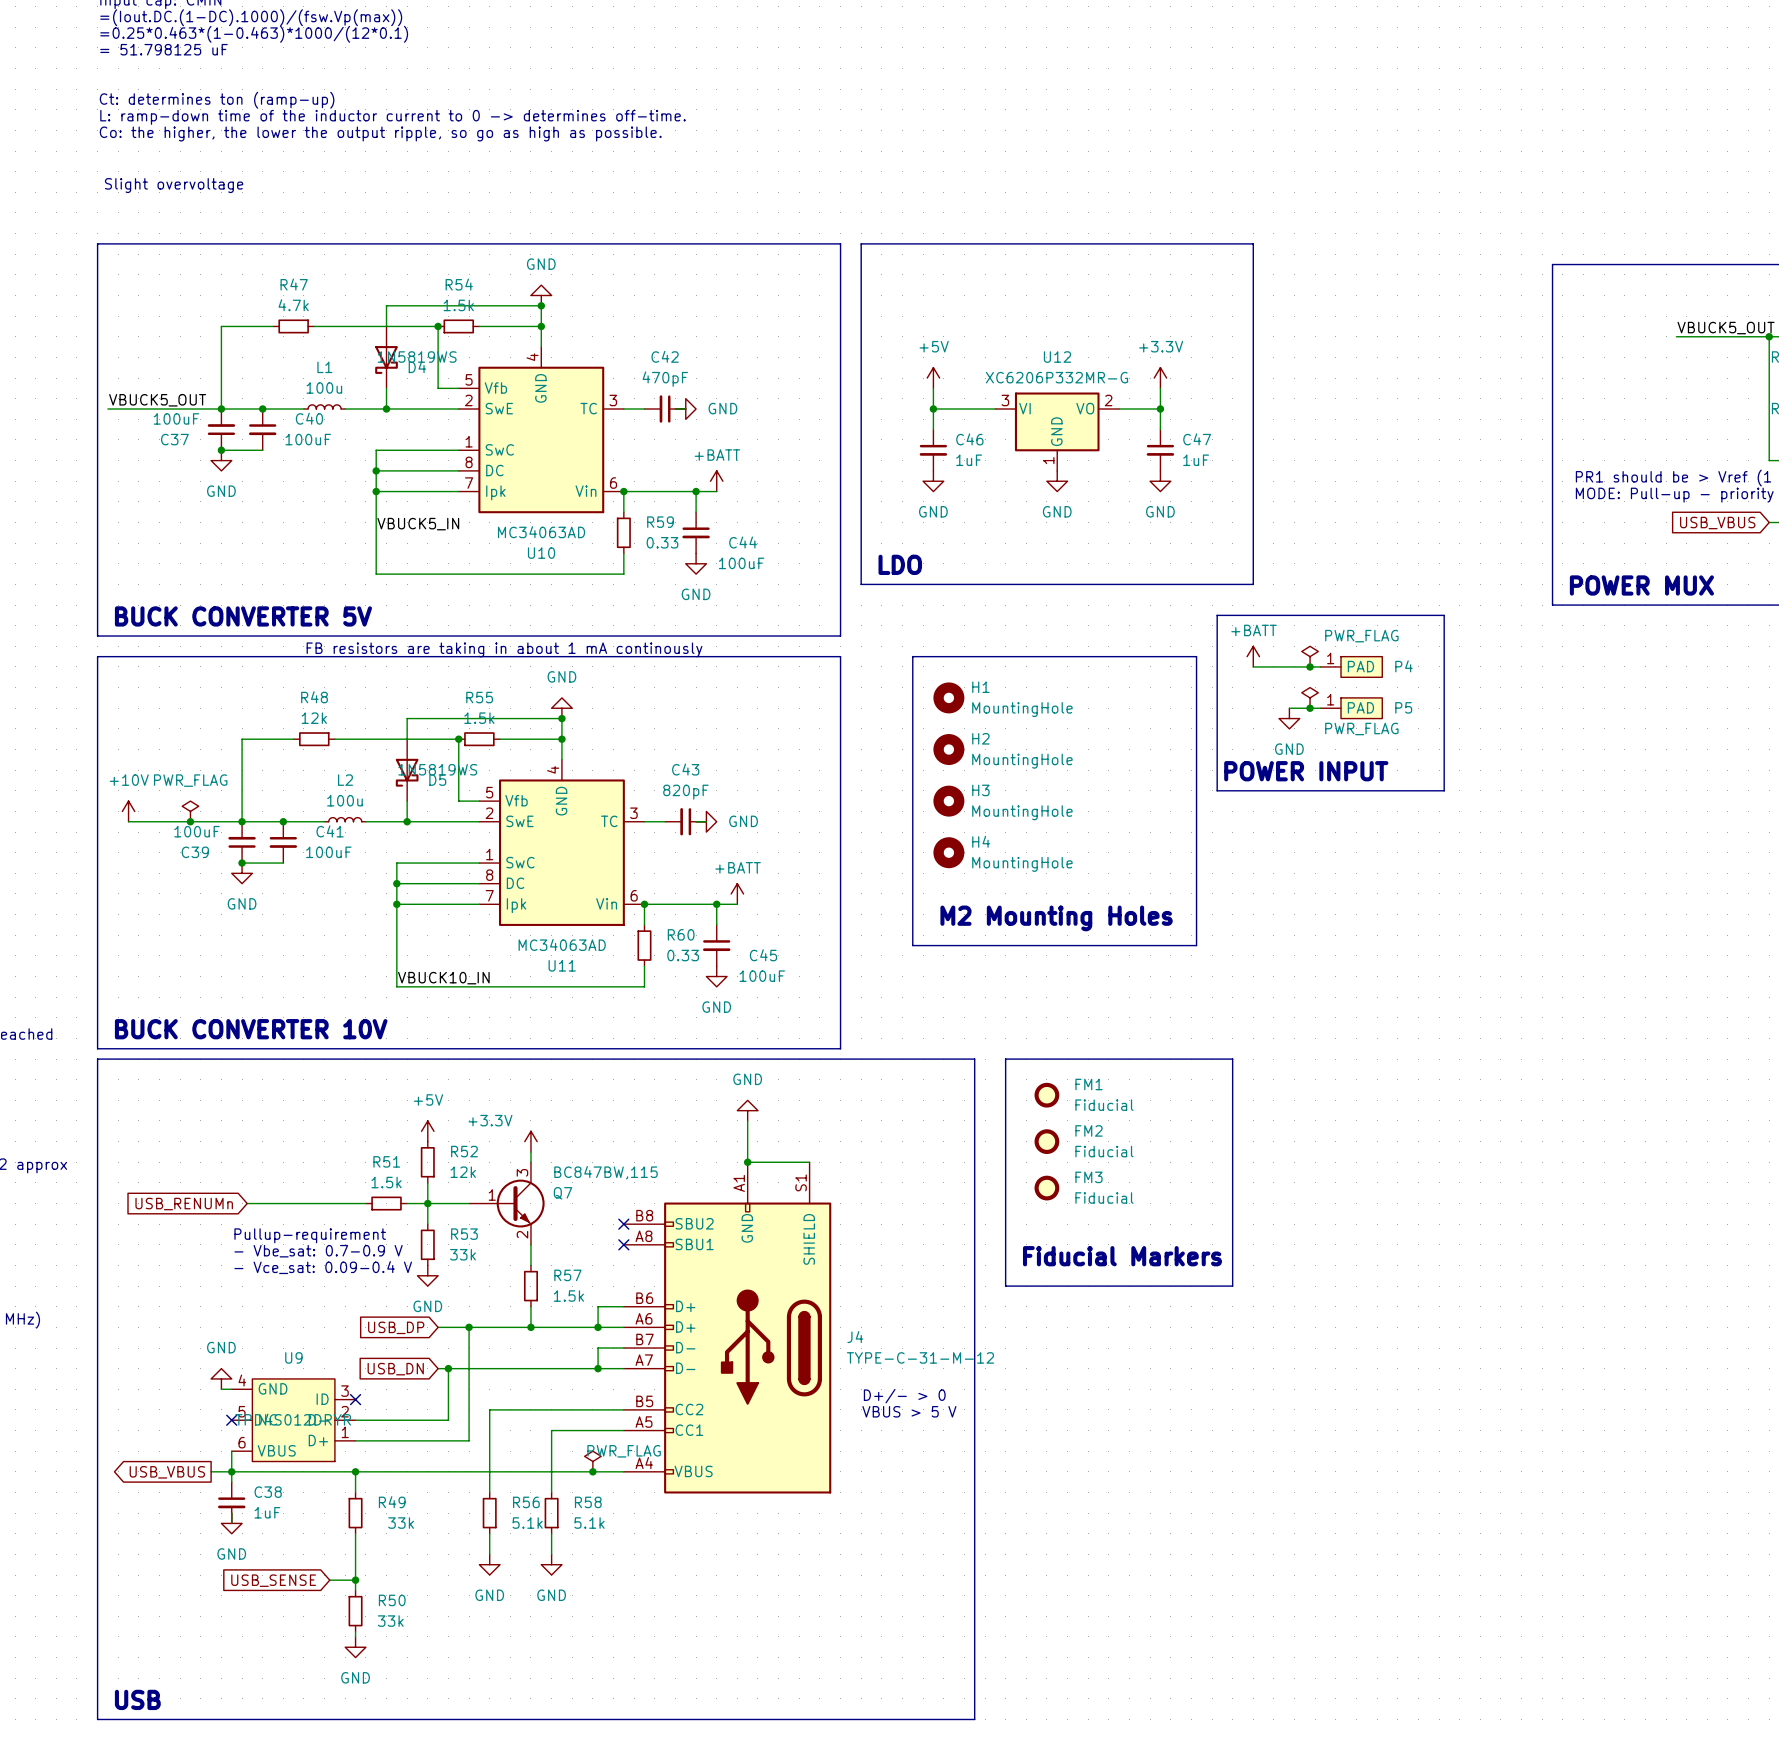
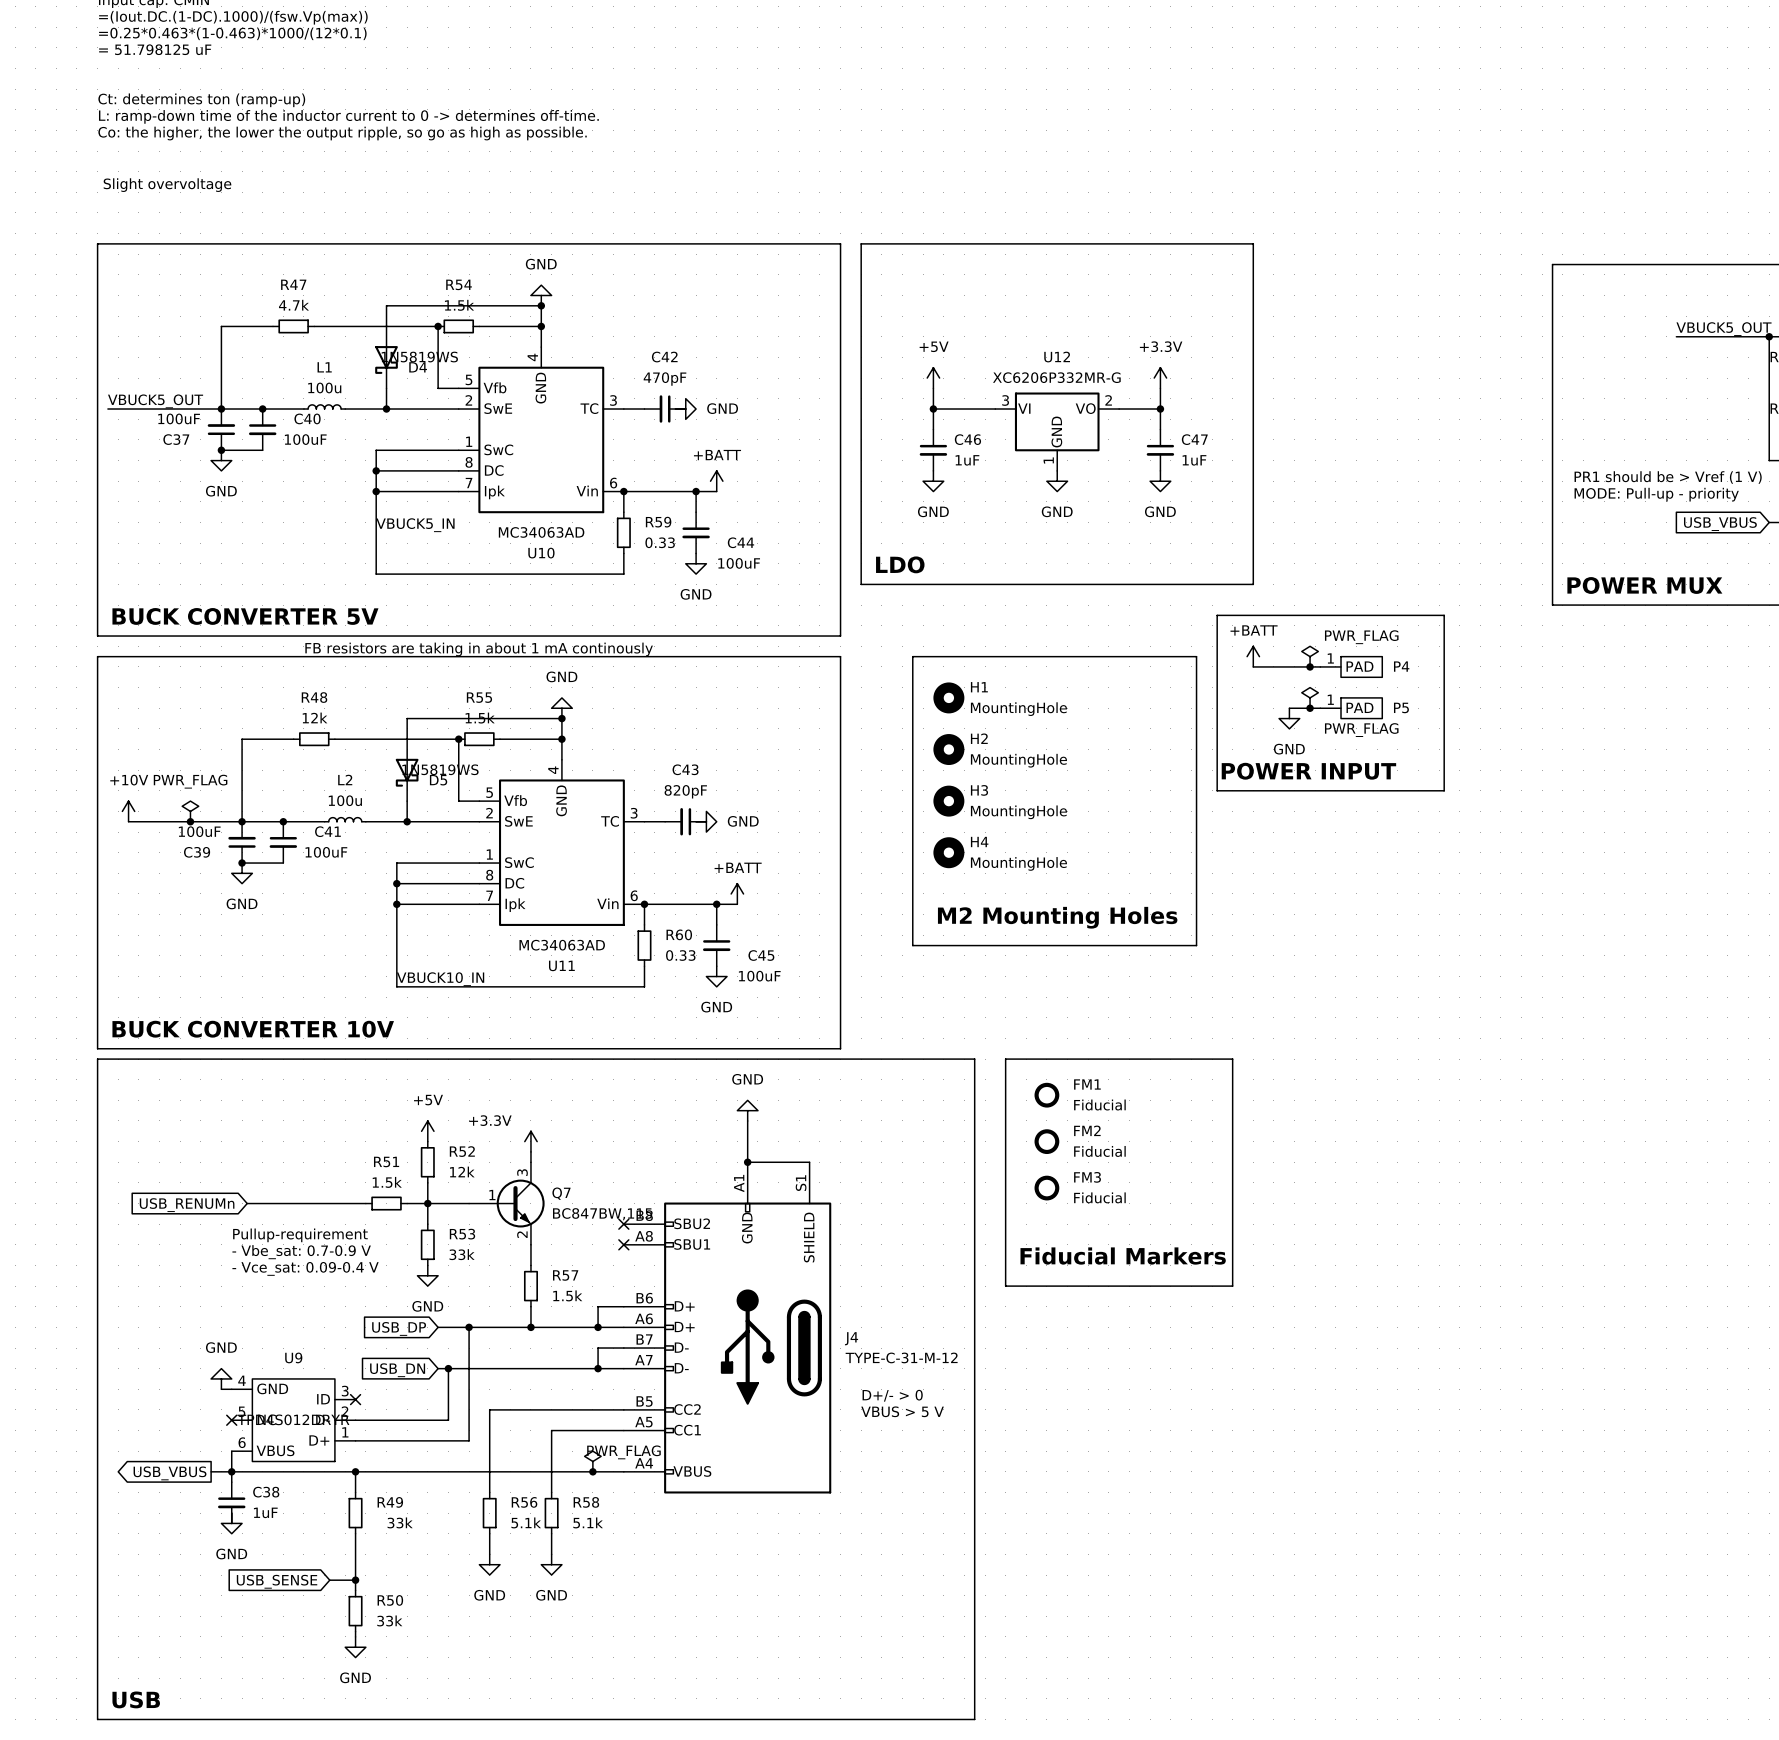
Q7 value position: BC847BW,115 (605, 1172) -> BC847BW,115 (602, 1214)

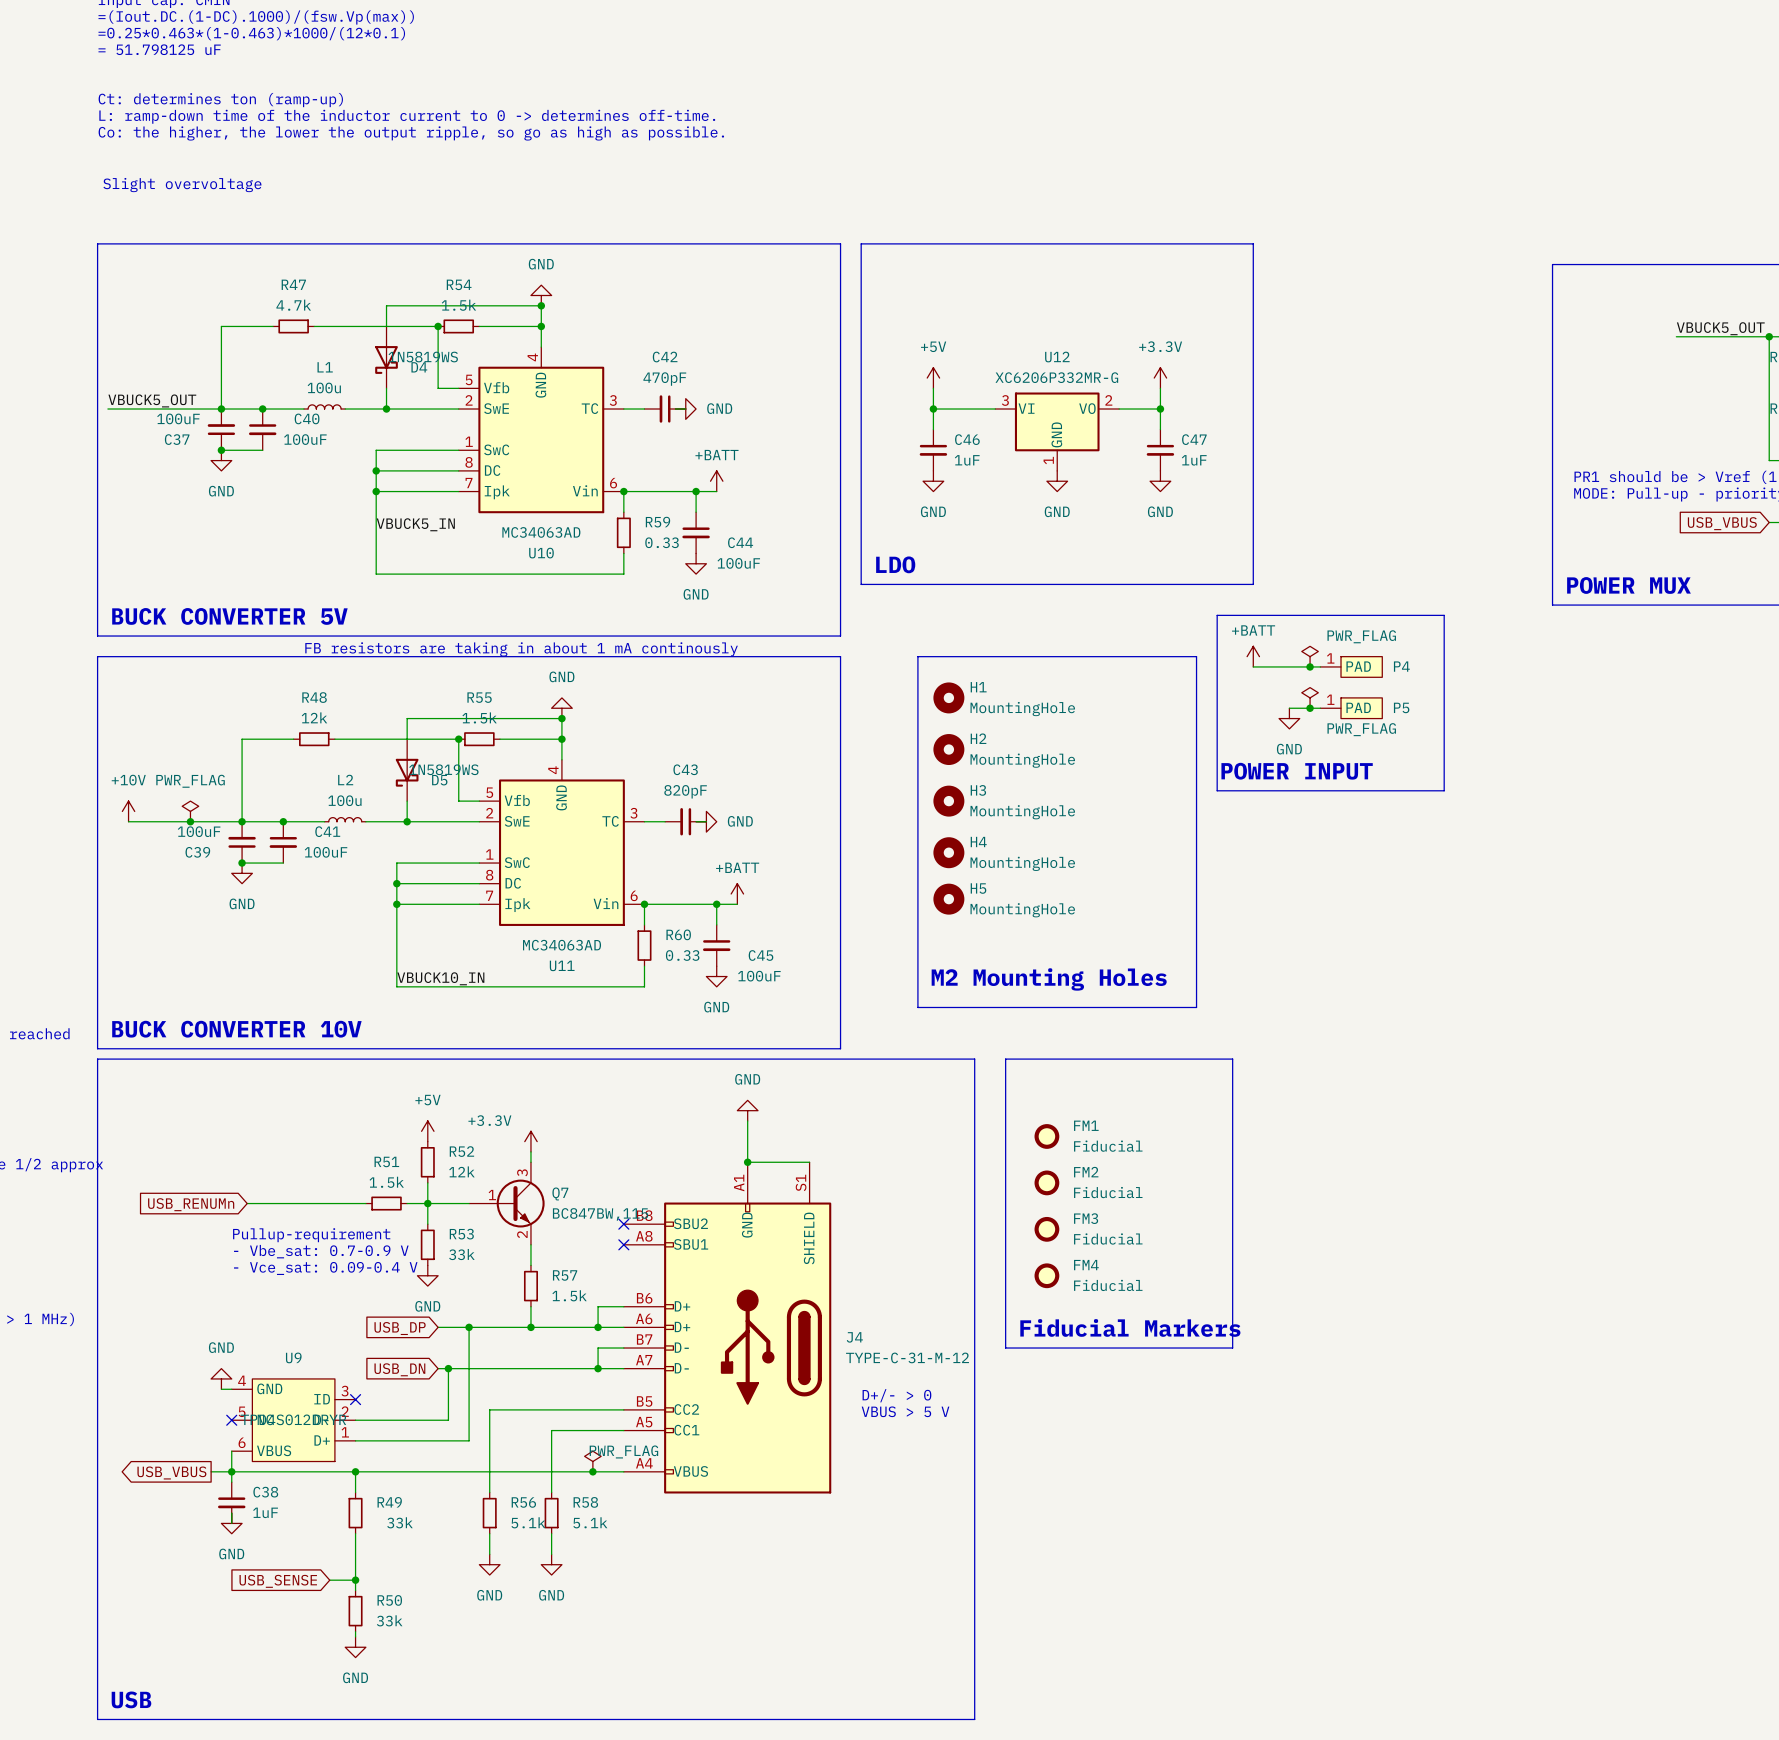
line: (917, 656) (912, 656) (912, 945) (1196, 945) -> (917, 656) (917, 1007) (1196, 1007) (1196, 945)
H5: none -> MountingHole (948, 899)
text position: M2 Mounting Holes (1057, 917) -> M2 Mounting Holes (1049, 979)
FM1 position: (1046, 1095) -> (1046, 1136)
FM2 position: (1046, 1141) -> (1046, 1182)
FM3 position: (1046, 1188) -> (1046, 1229)
text position: Fiducial Markers (1123, 1256) -> Fiducial Markers (1130, 1327)
FM4: none -> Fiducial (1046, 1275)
line: (1005, 1286) (1232, 1286) -> (1005, 1286) (1005, 1348) (1232, 1348) (1232, 1286)

